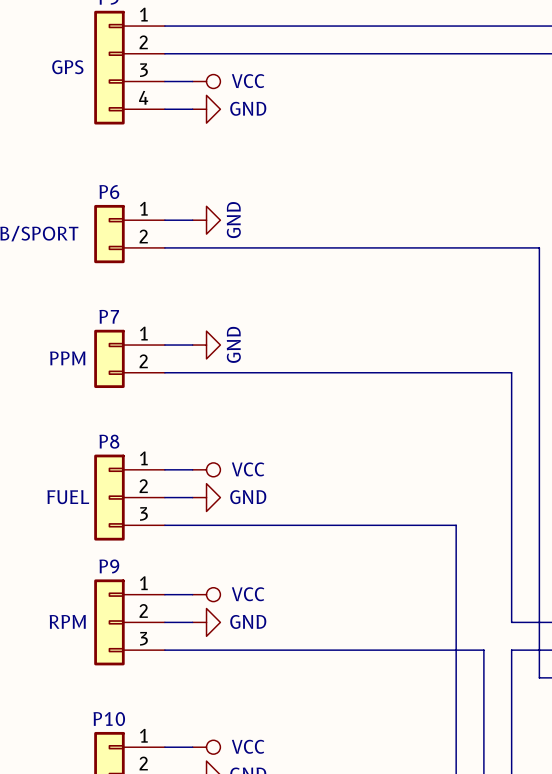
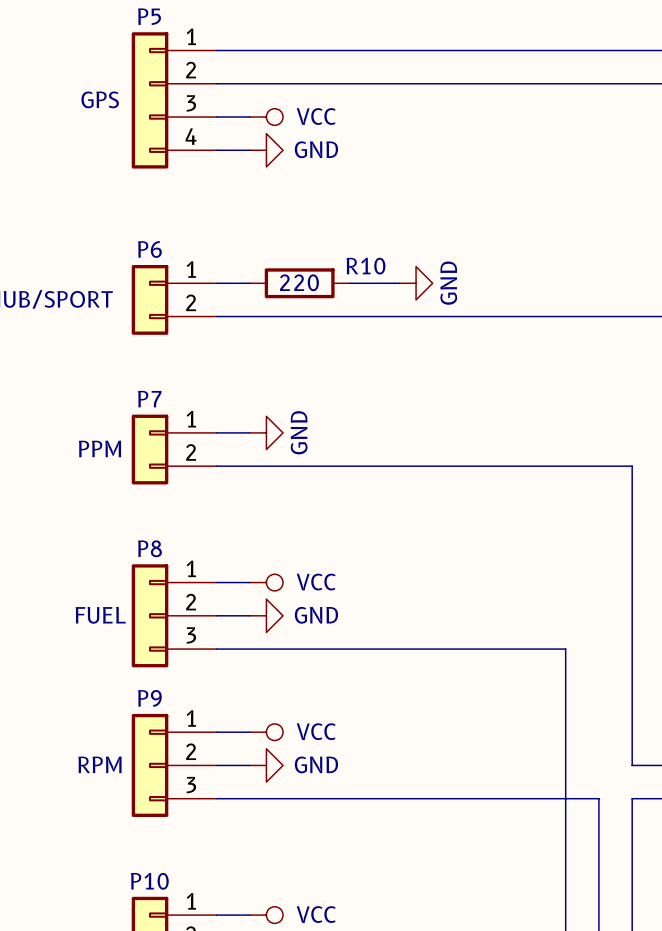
power symbol position: GND (206, 220) -> GND (416, 283)
R10: none -> 220 (299, 283)
wire: none -> (349, 283) (399, 283)

